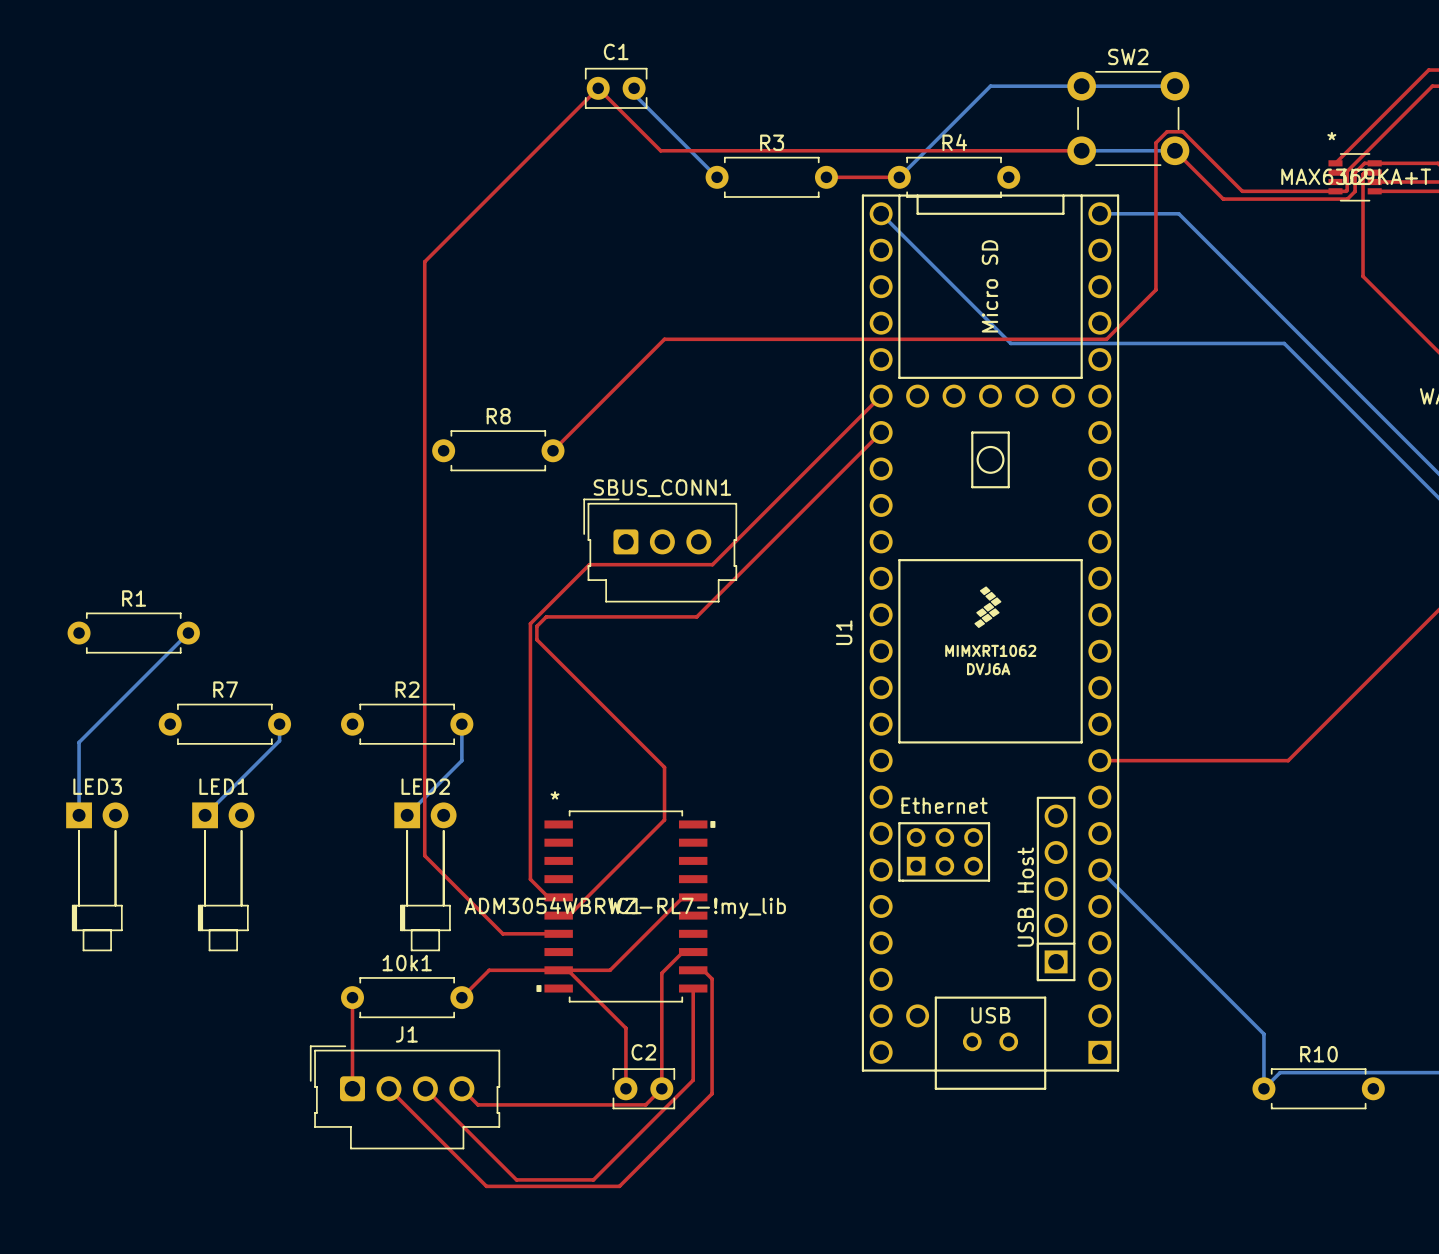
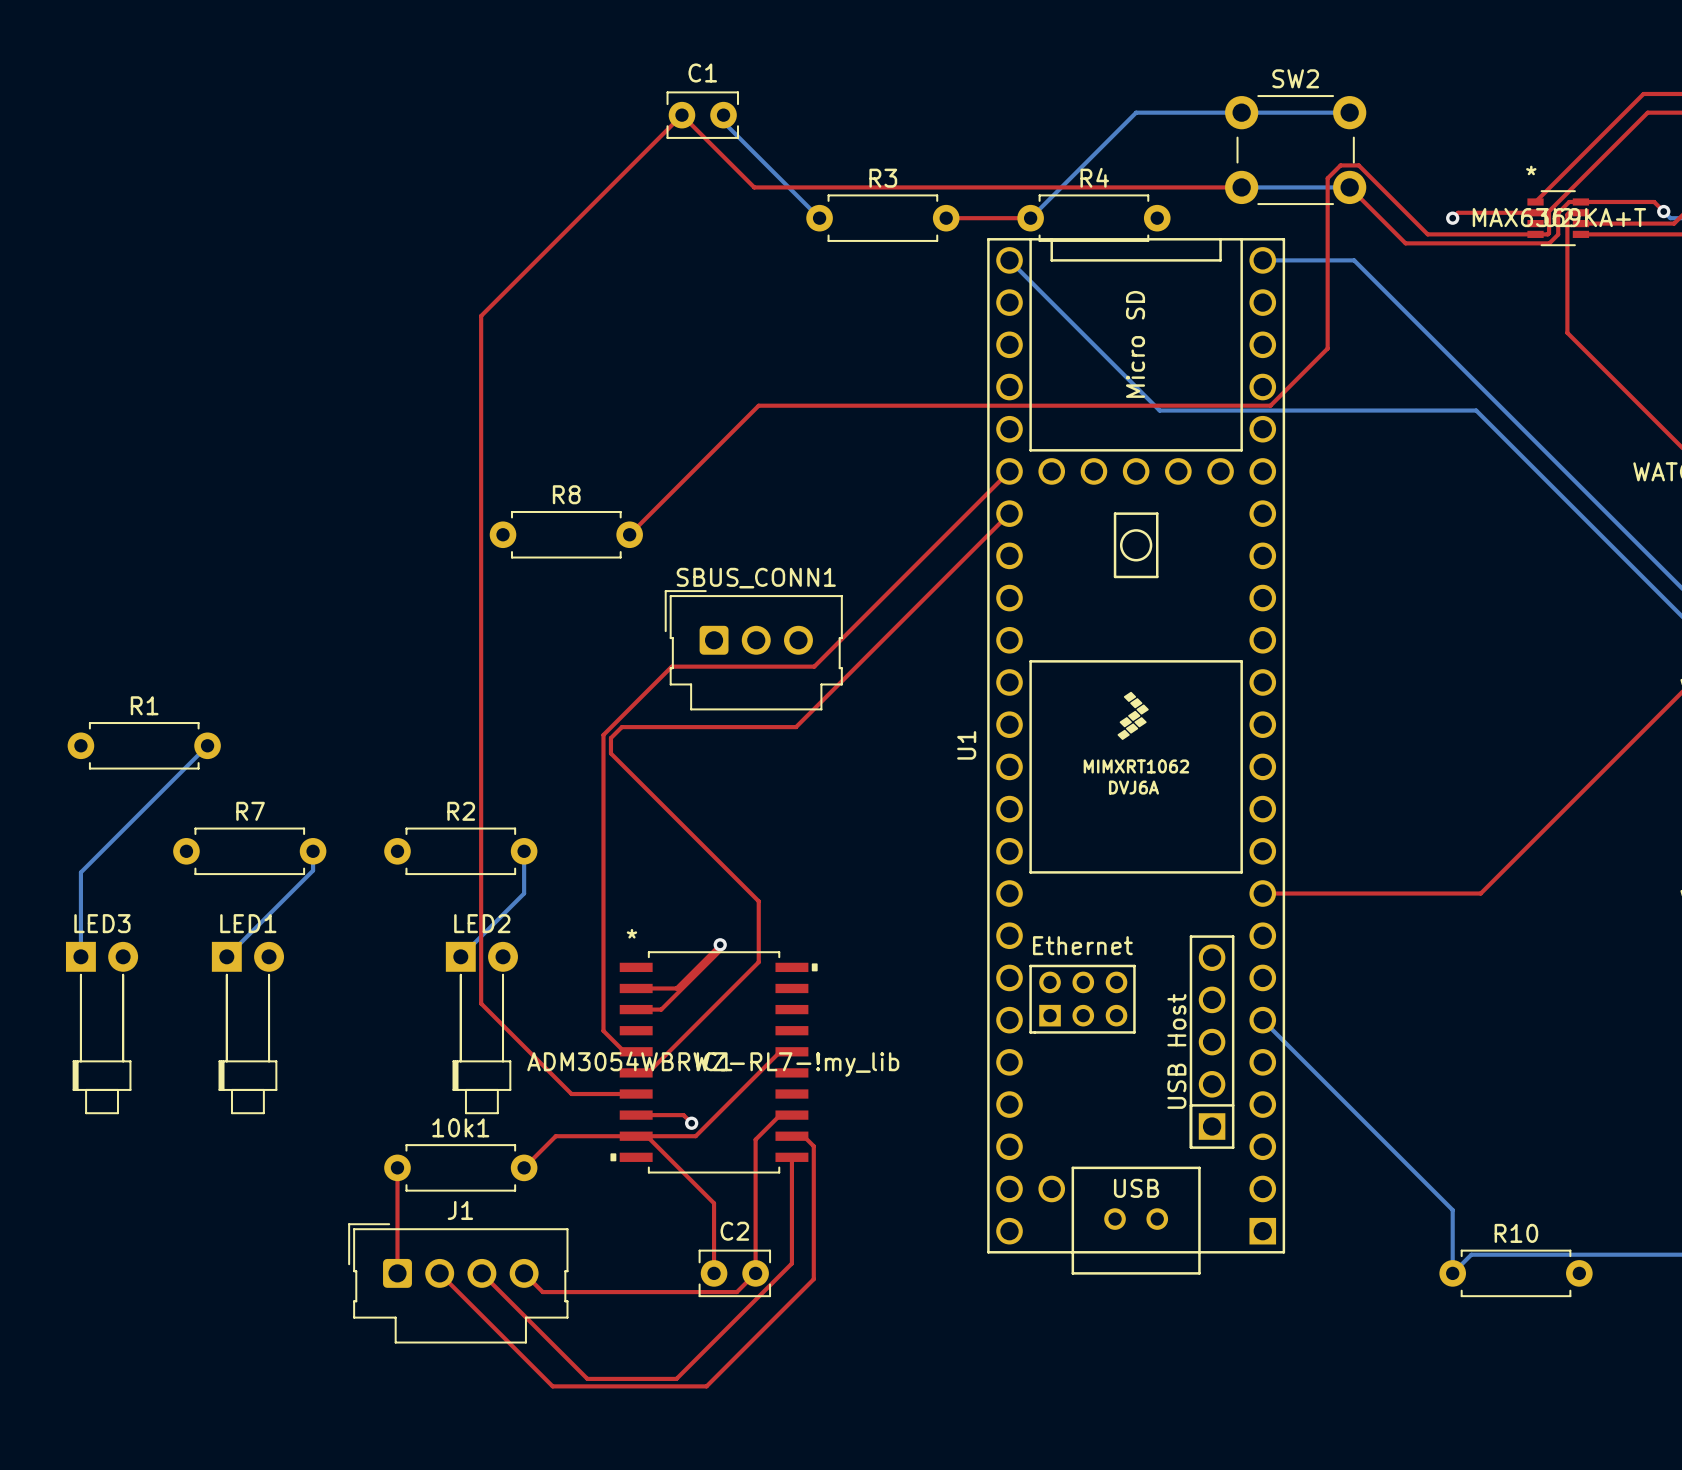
top track: none -> (1535, 212) (1458, 212) (1452, 218)
via: none -> (1452, 218)
via: none -> (720, 944)
top track: none -> (636, 988) (676, 988) (720, 944) (720, 950) (661, 1009) (636, 1009)
top track: none -> (636, 1115) (683, 1115) (691, 1123)
via: none -> (691, 1123)

